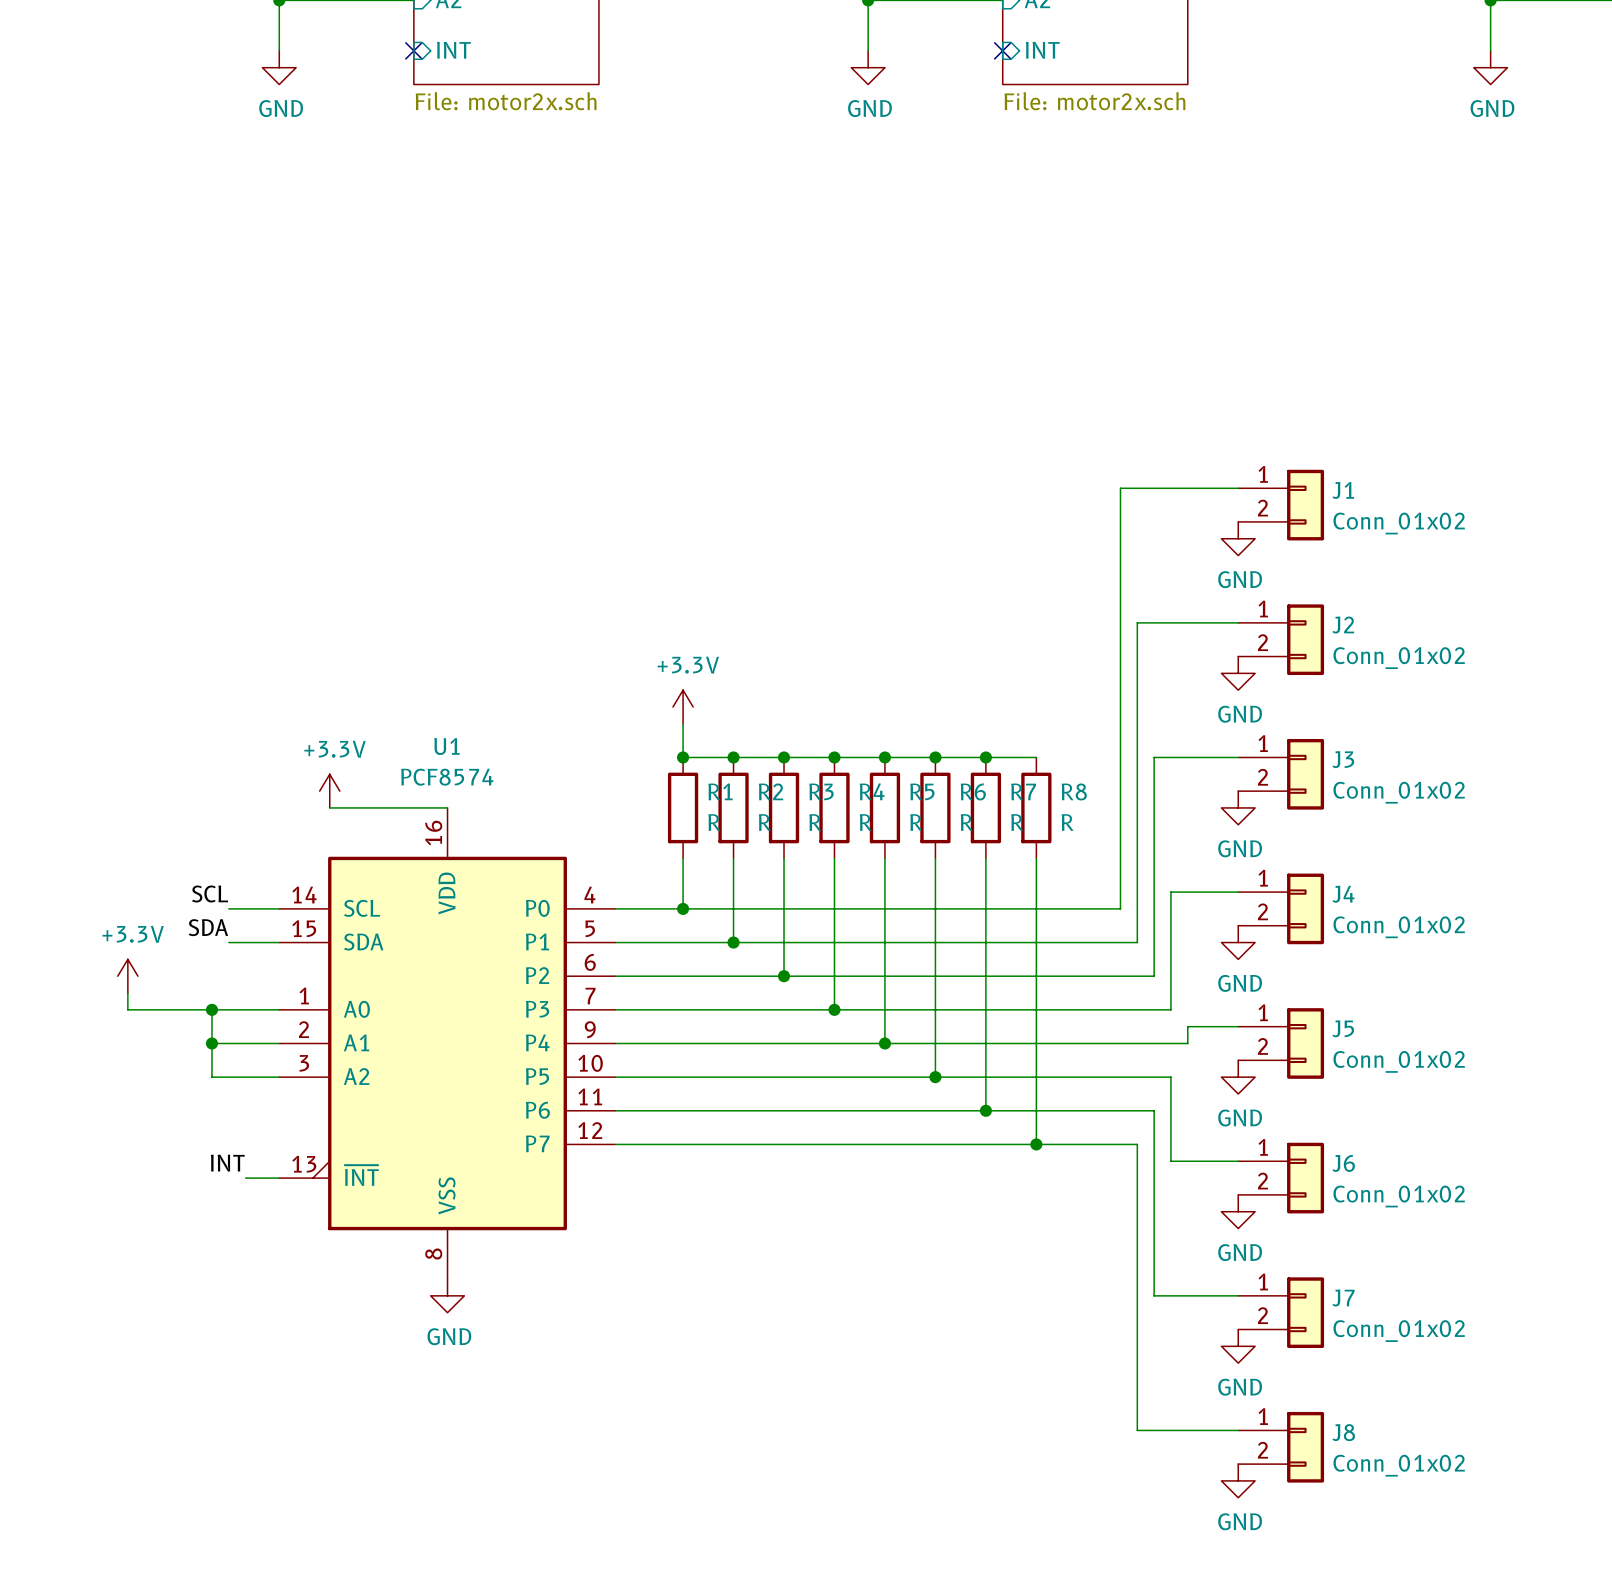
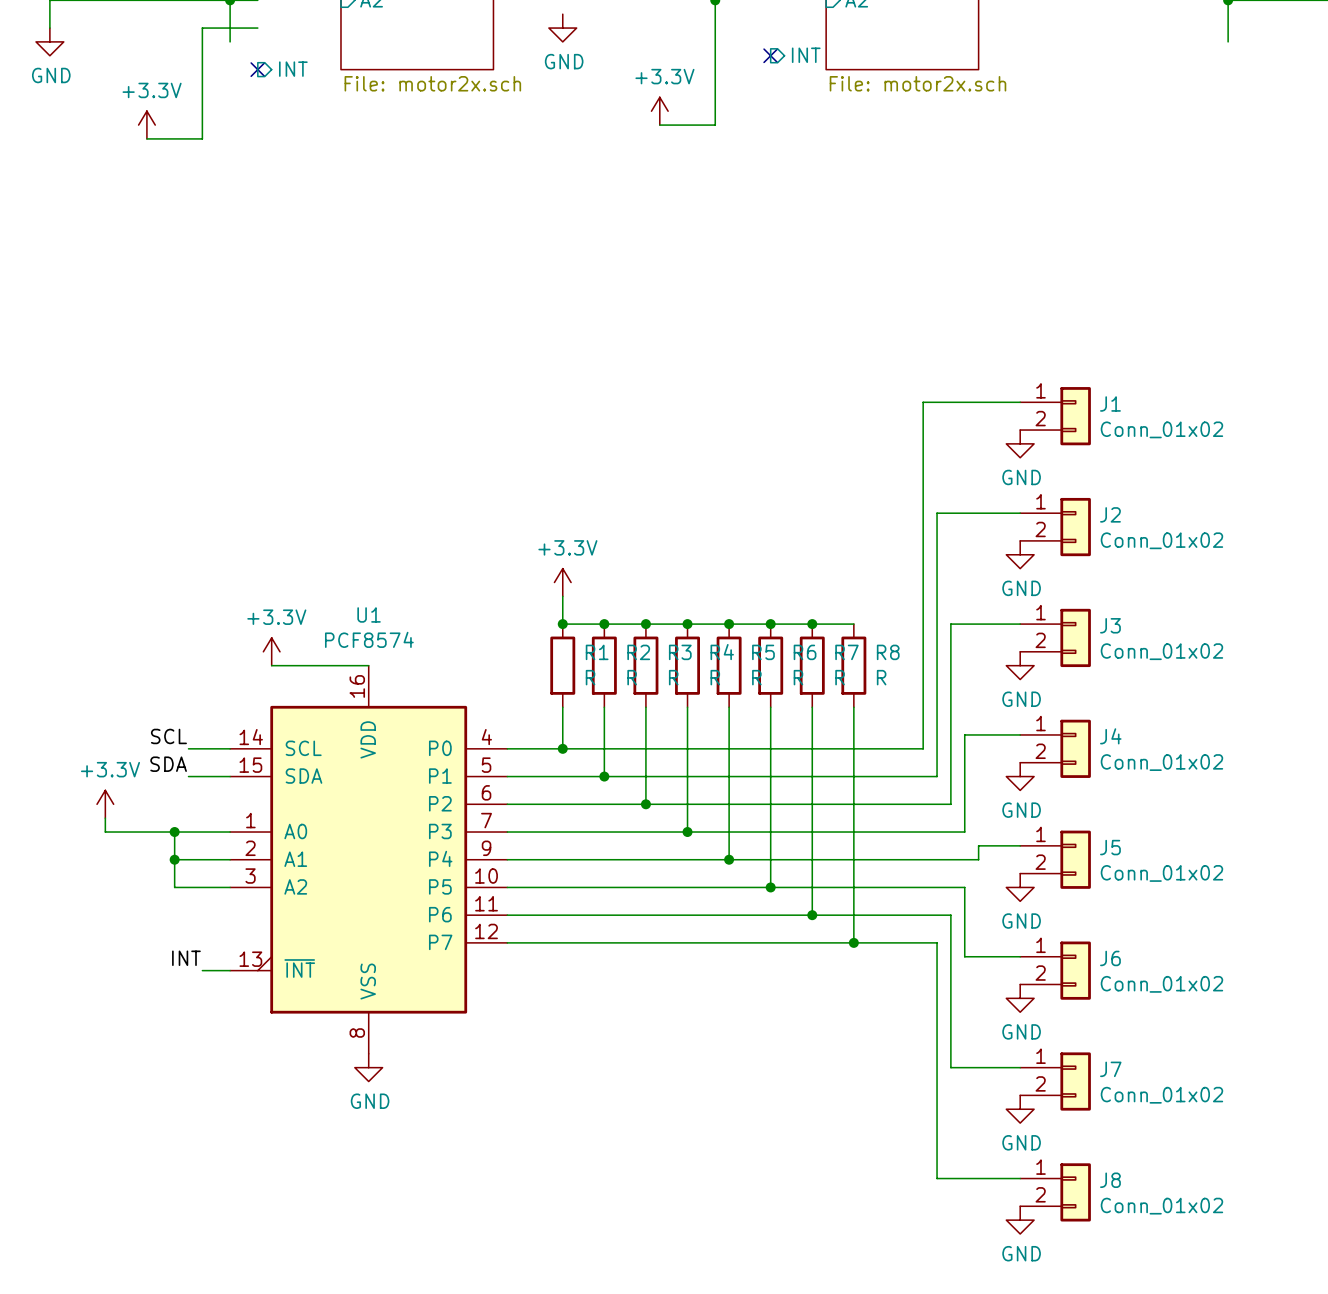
wire: none -> (230, 0) (49, 0) (49, 28)
wire: (312, 0) (413, 0) -> none
wire: (868, 0) (1002, 0) -> none
wire: none -> (257, 28) (202, 28) (202, 138) (146, 138)
power symbol: none -> GND (49, 41)
no-connect mark: (413, 50) -> none
sheet pin position: INT (453, 50) -> INT (293, 69)
wire: none -> (715, 41) (715, 125) (659, 125)
no-connect mark position: (1002, 50) -> (770, 55)
sheet pin position: INT (1042, 50) -> INT (806, 55)
power symbol: GND (279, 67) -> none
power symbol position: GND (868, 67) -> GND (562, 28)
power symbol: GND (1490, 67) -> none
no-connect mark: none -> (257, 69)
power symbol: none -> +3.3V (659, 111)
power symbol: none -> +3.3V (146, 125)

